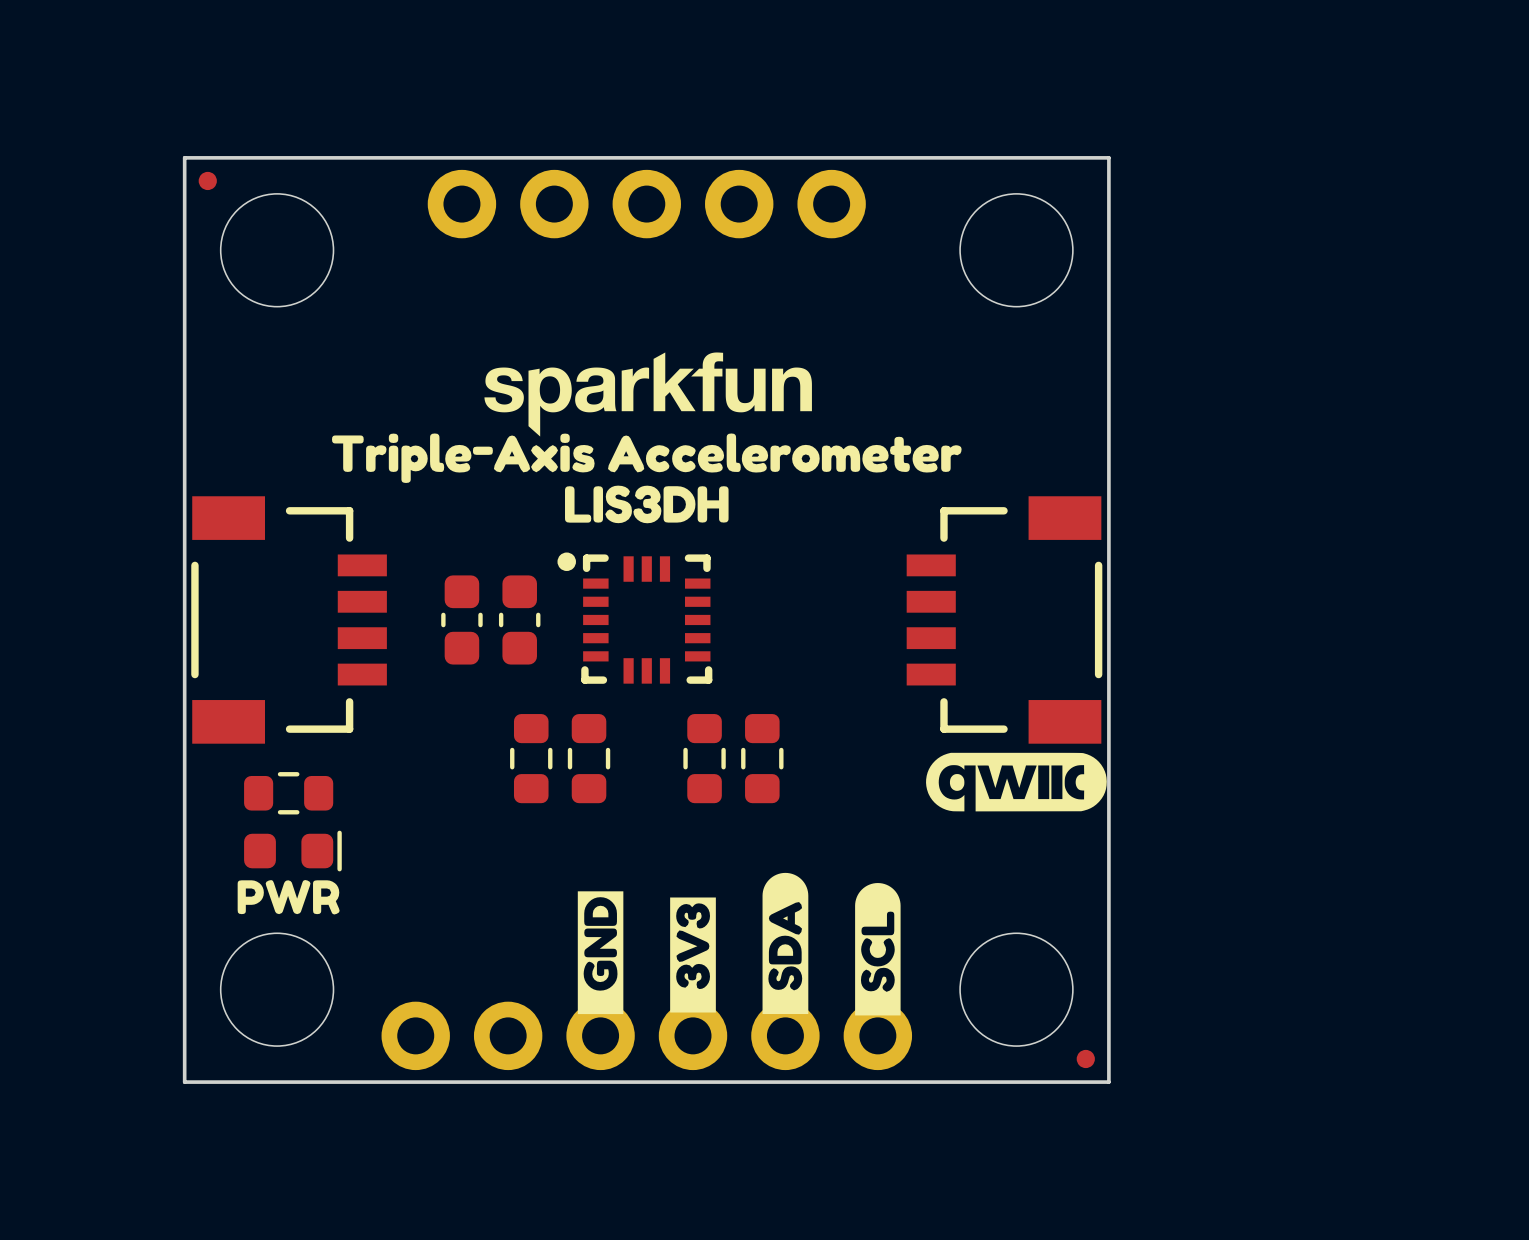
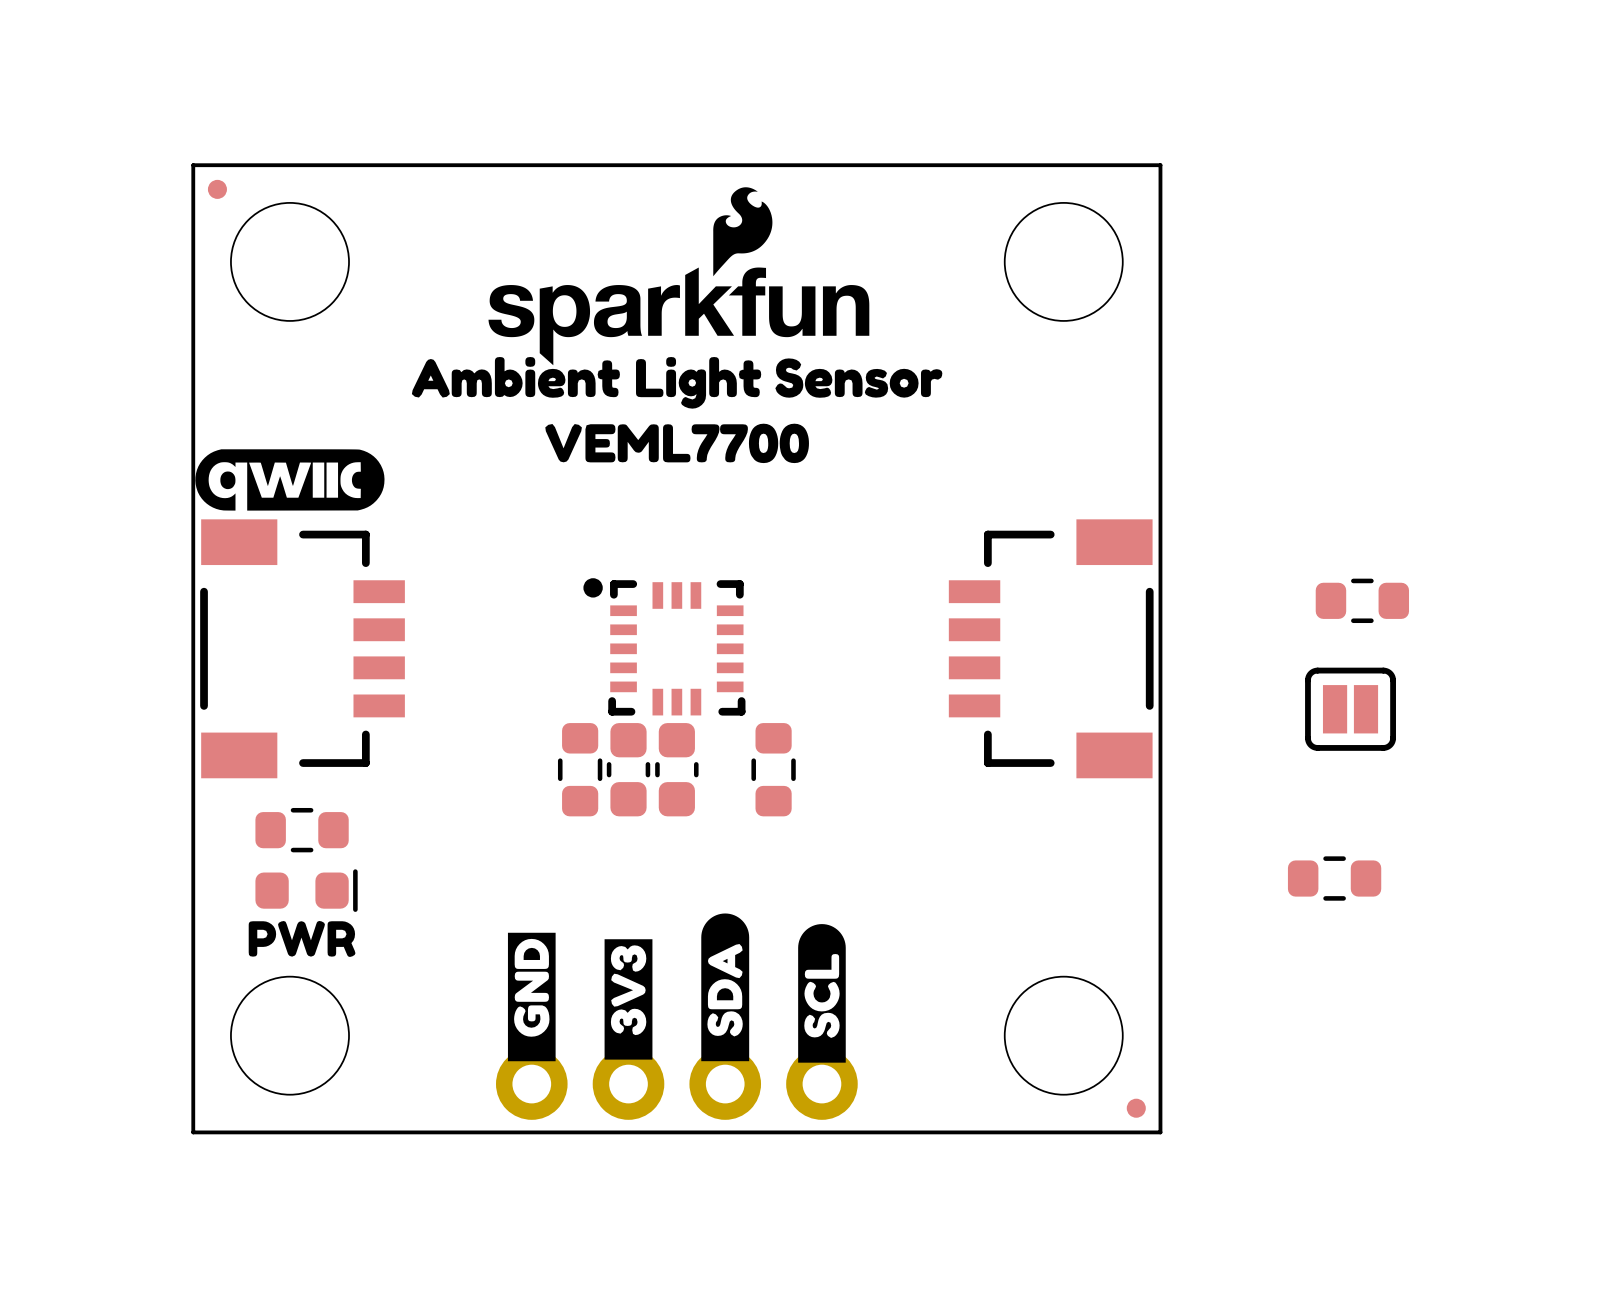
drawing: none -> [411, 187, 943, 464]
part: (646, 204) -> none
drawing: [331, 352, 962, 524] -> none
part: none -> (1362, 600)
part: (461, 619) -> none
part: (519, 619) -> none
part: none -> (1350, 709)
part: none -> (580, 769)
part: none -> (628, 769)
part: none -> (676, 769)
part: none -> (773, 769)
part: (531, 758) -> none
part: (589, 758) -> none
part: (704, 758) -> none
part: (762, 758) -> none
drawing position: (1016, 782) -> (289, 479)
part: none -> (1334, 878)
drawing position: (785, 943) -> (725, 987)
drawing position: (877, 949) -> (821, 993)
drawing position: (600, 952) -> (531, 997)
drawing position: (693, 955) -> (628, 999)
part: (461, 1035) -> none
part position: (739, 1035) -> (676, 1084)

